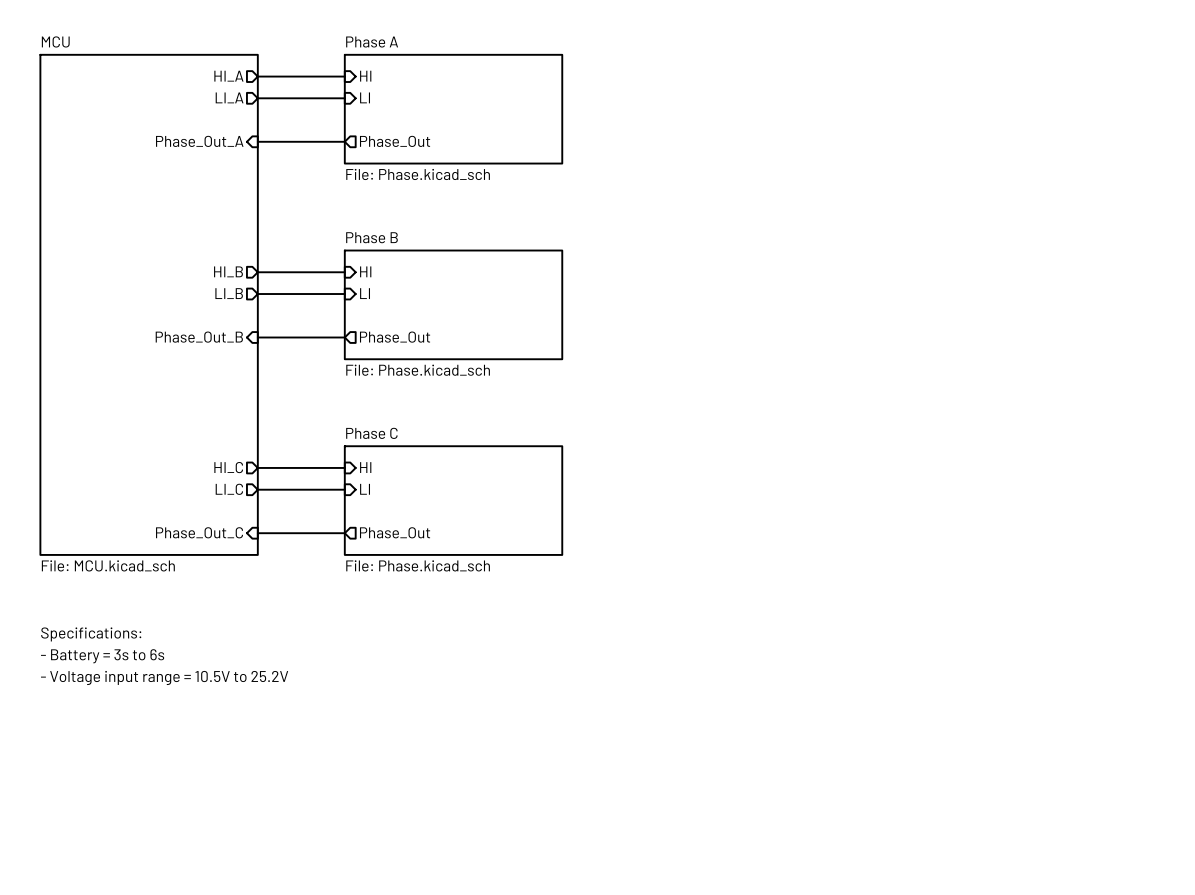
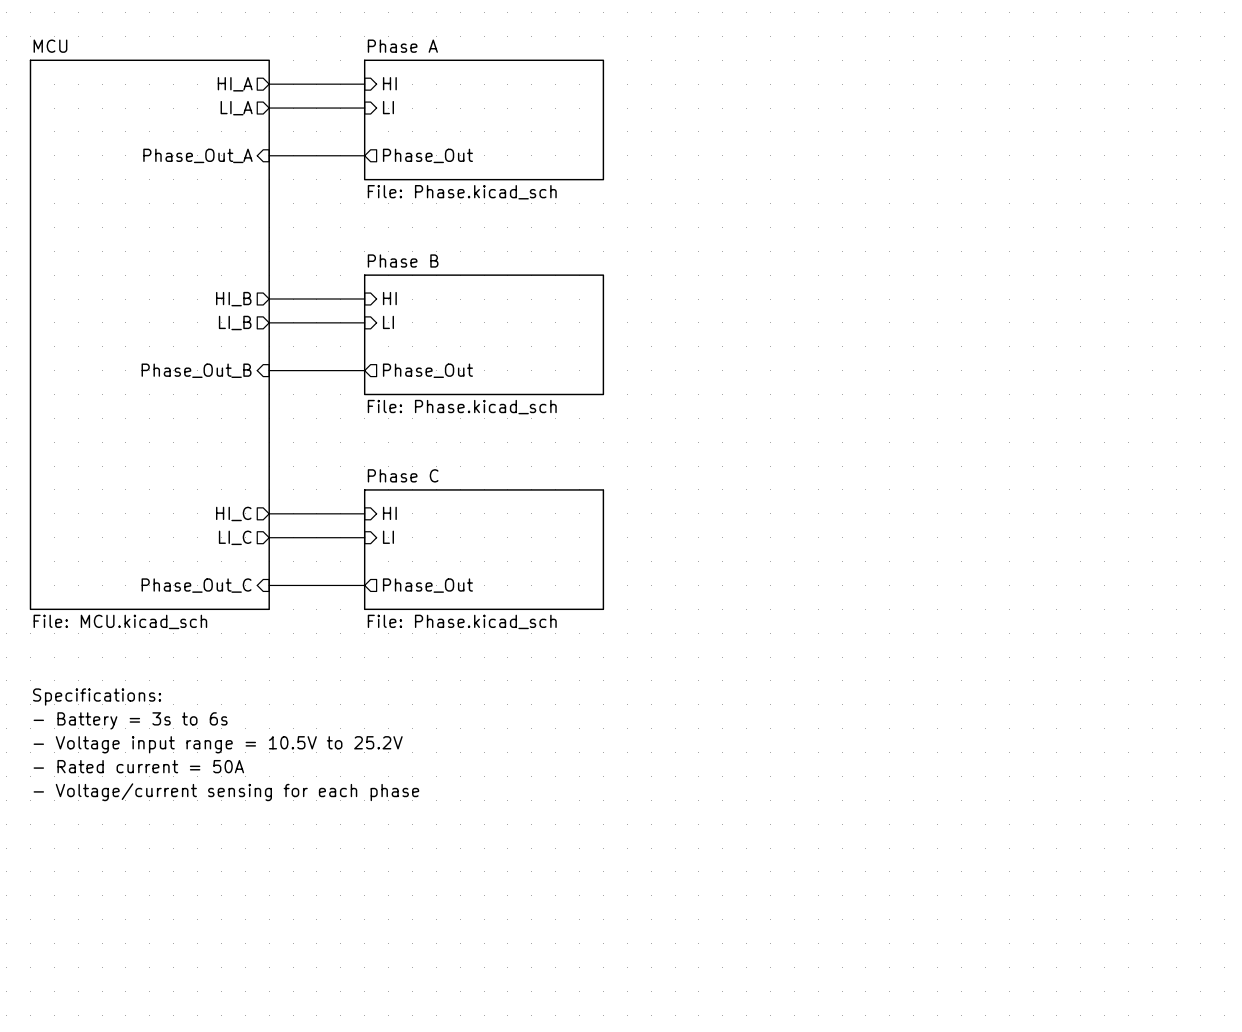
text: none -> - Rated current = 50A (138, 766)
text: none -> - Voltage/current sensing for each phase (226, 792)

